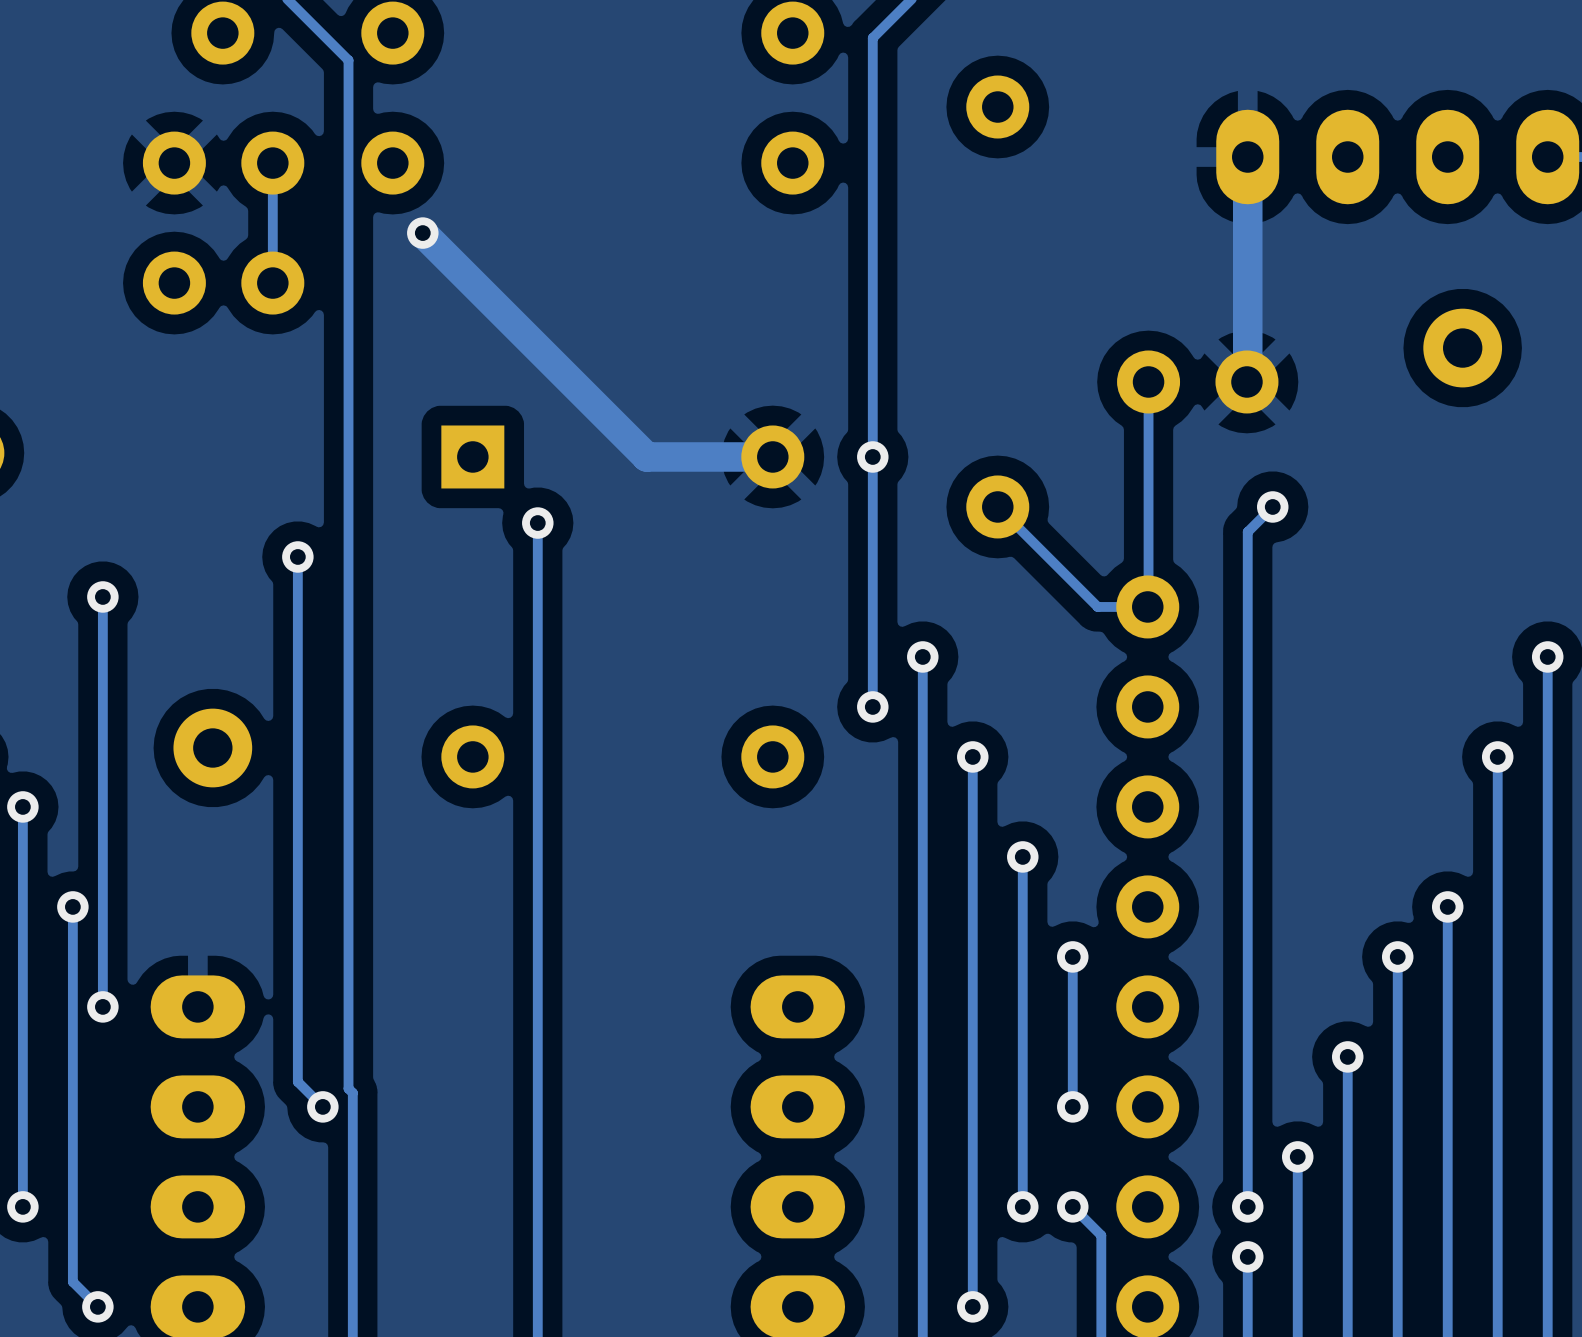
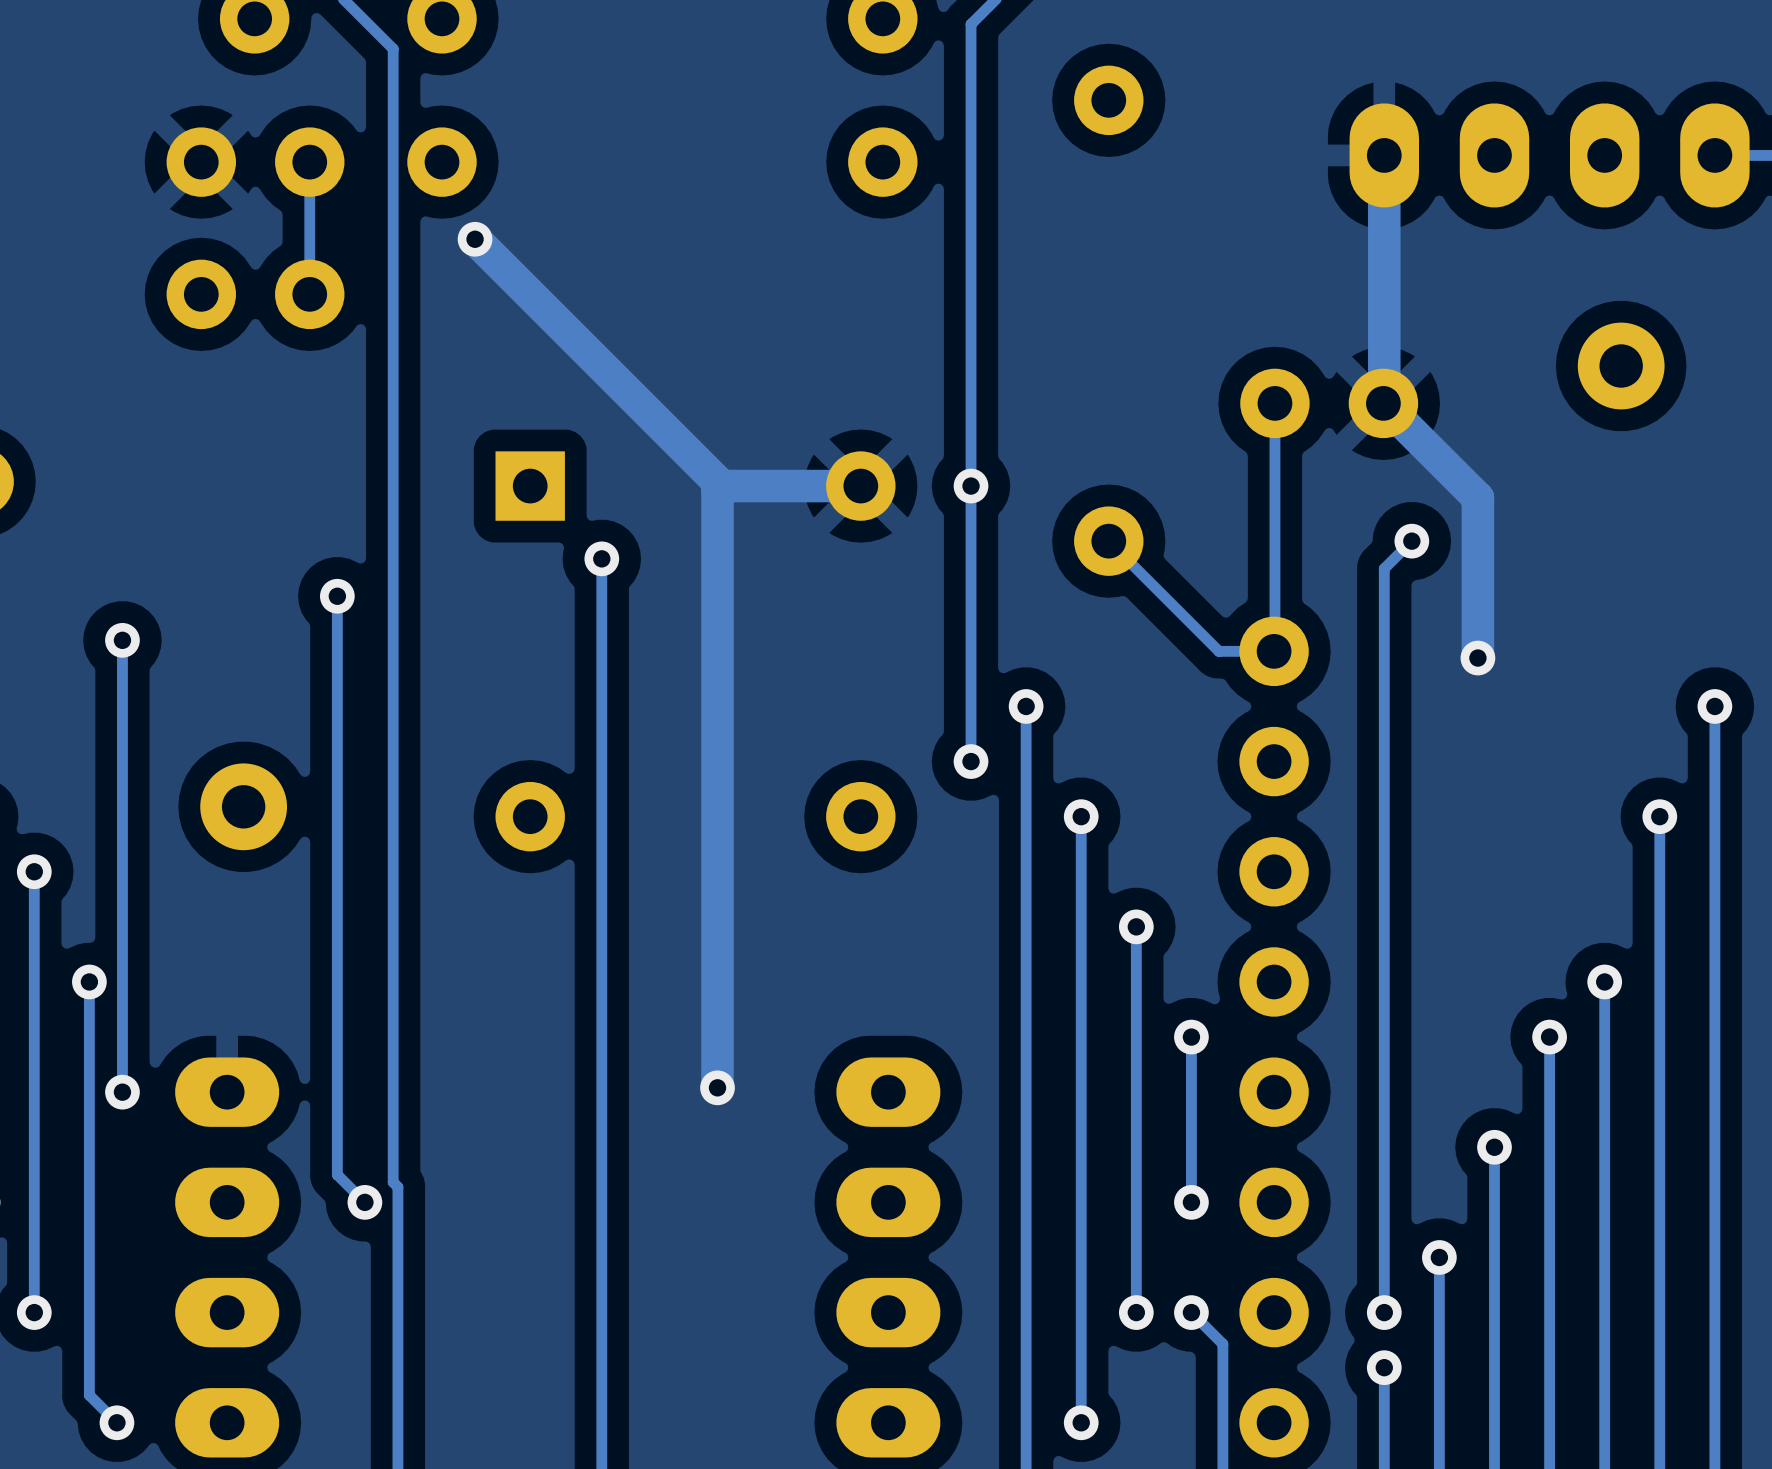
track: none -> (1383, 403) (1477, 497) (1477, 658)
track: none -> (721, 486) (717, 490) (717, 1087)
via: none -> (1477, 658)
via: none -> (717, 1087)

